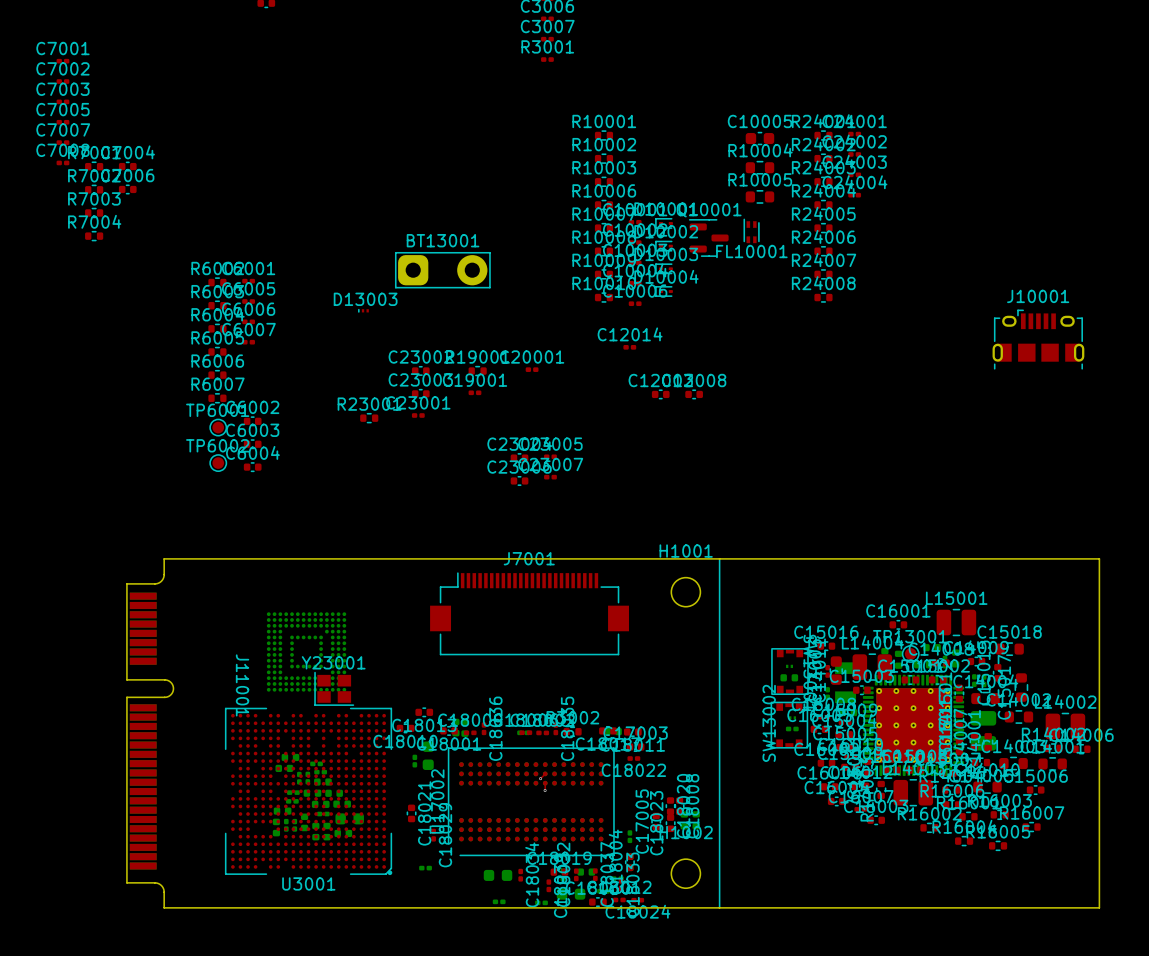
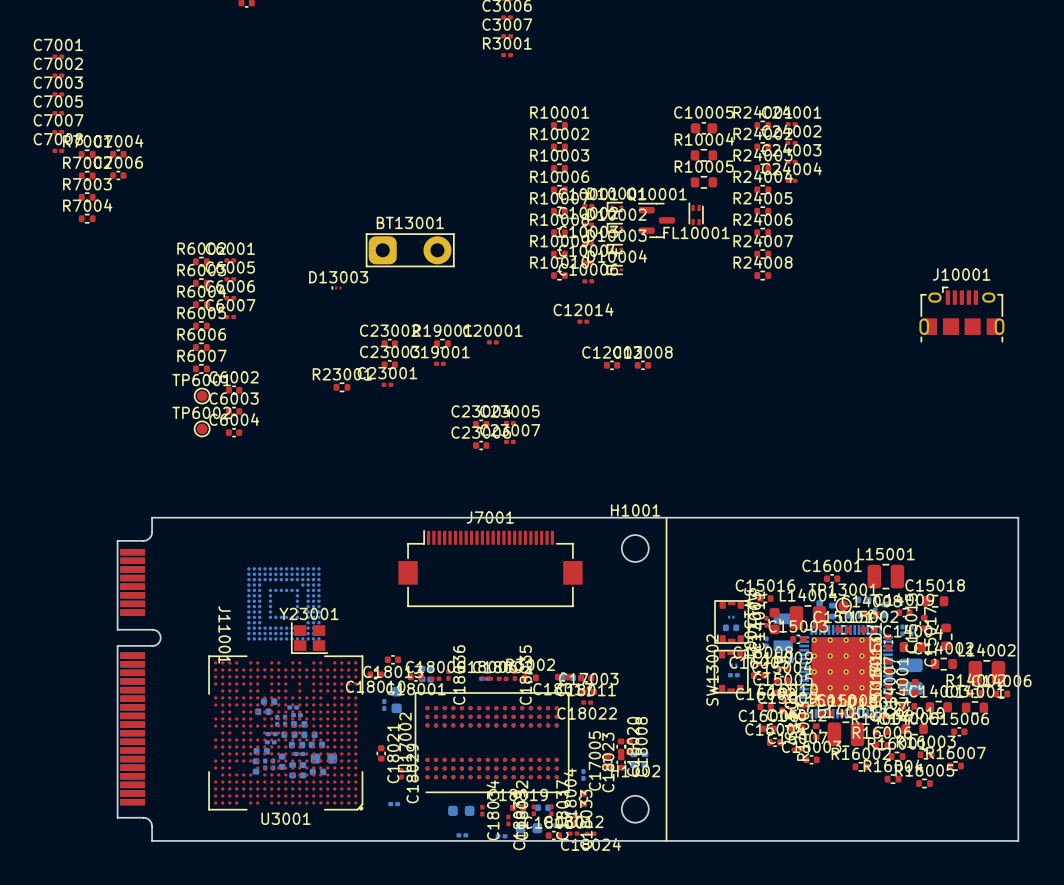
top track: (545, 773) (540, 778) -> none
via: (540, 778) -> none
top track: (545, 783) (545, 790) -> none
via: (545, 790) -> none

